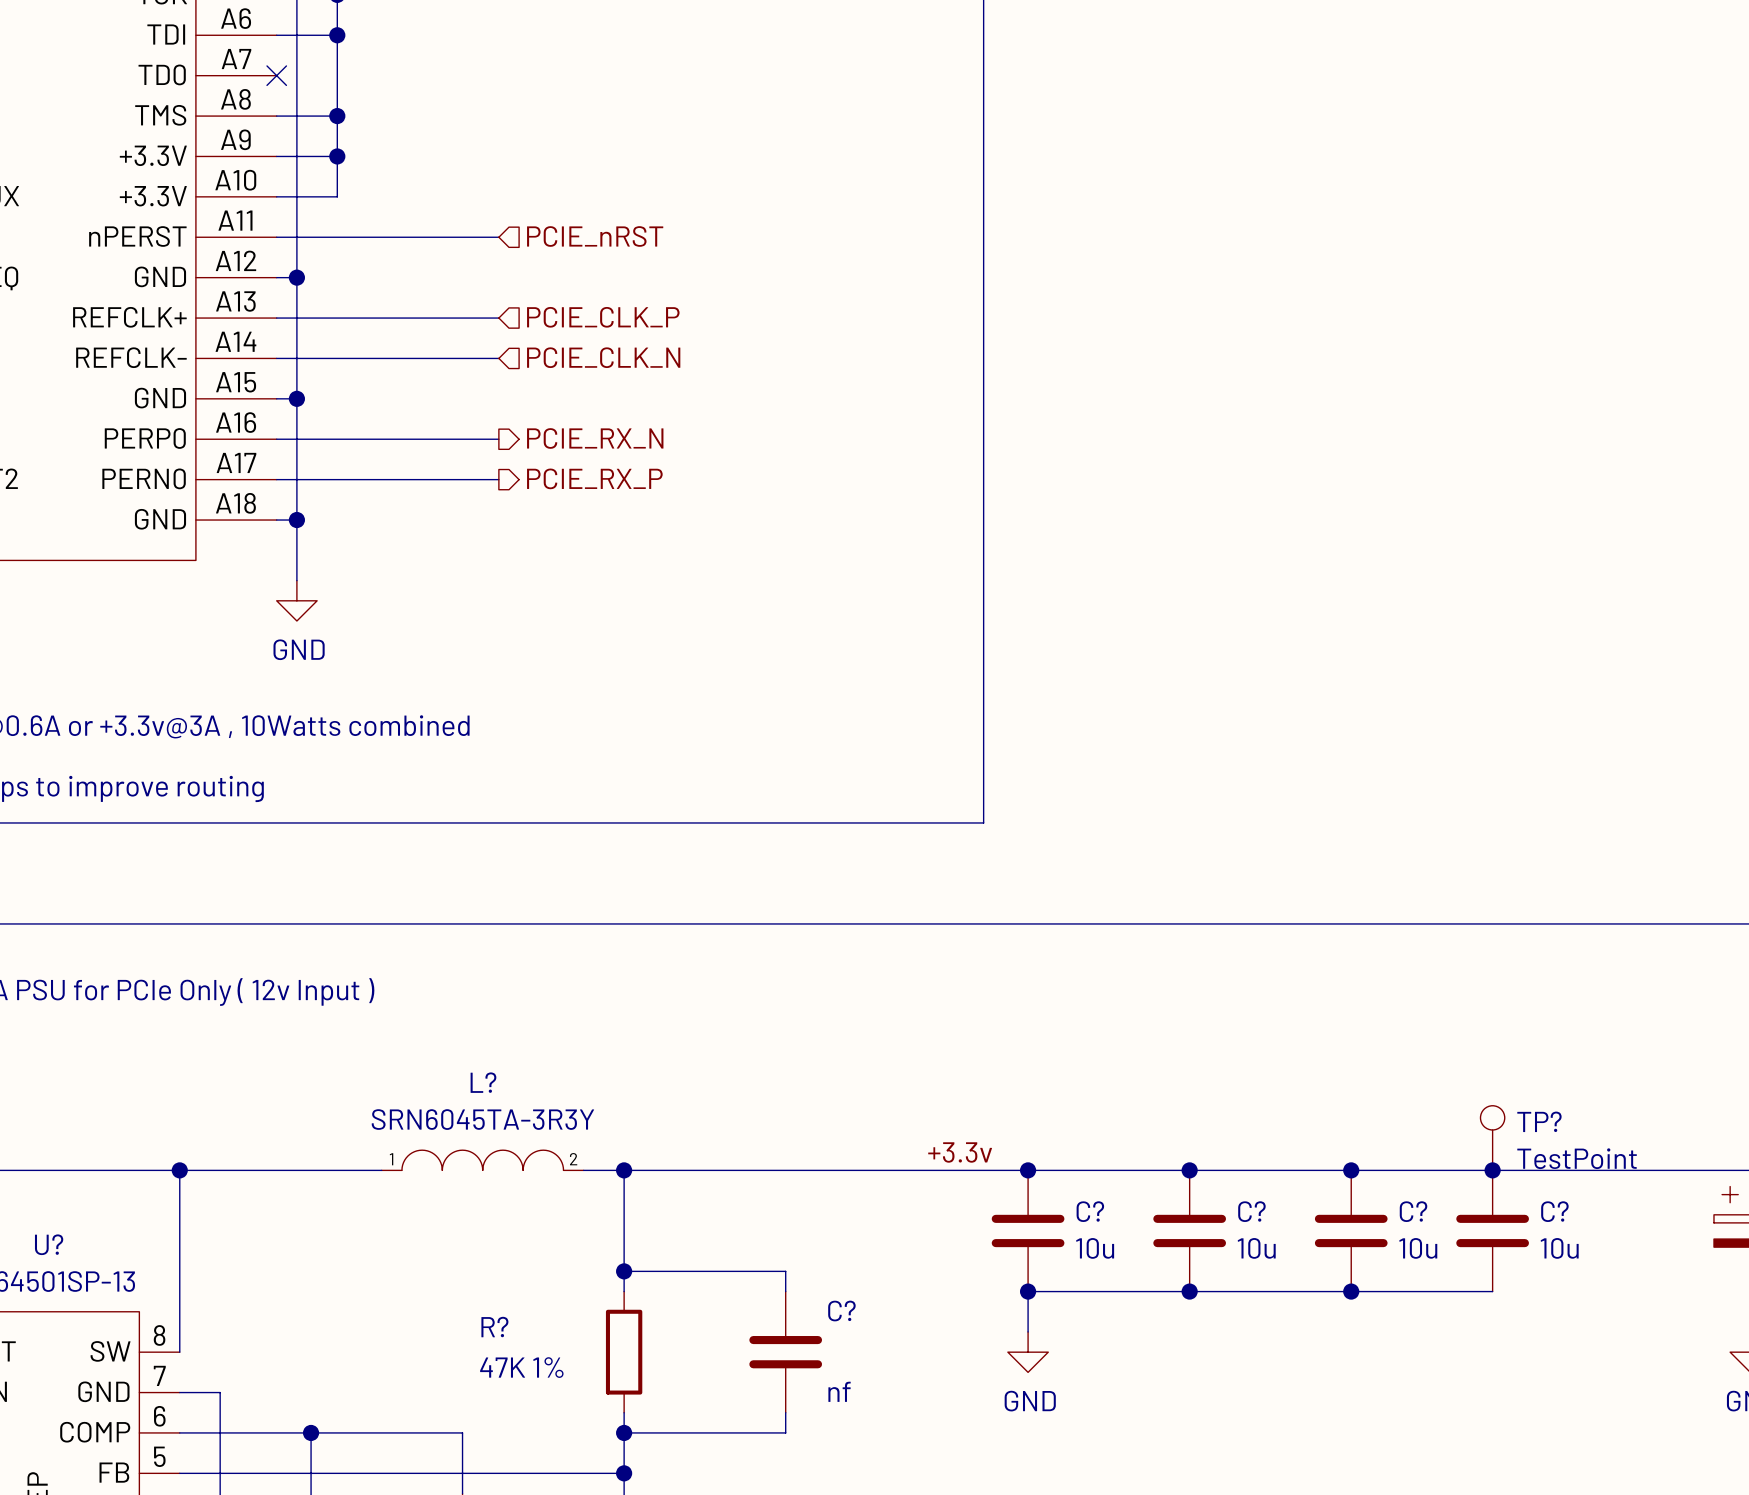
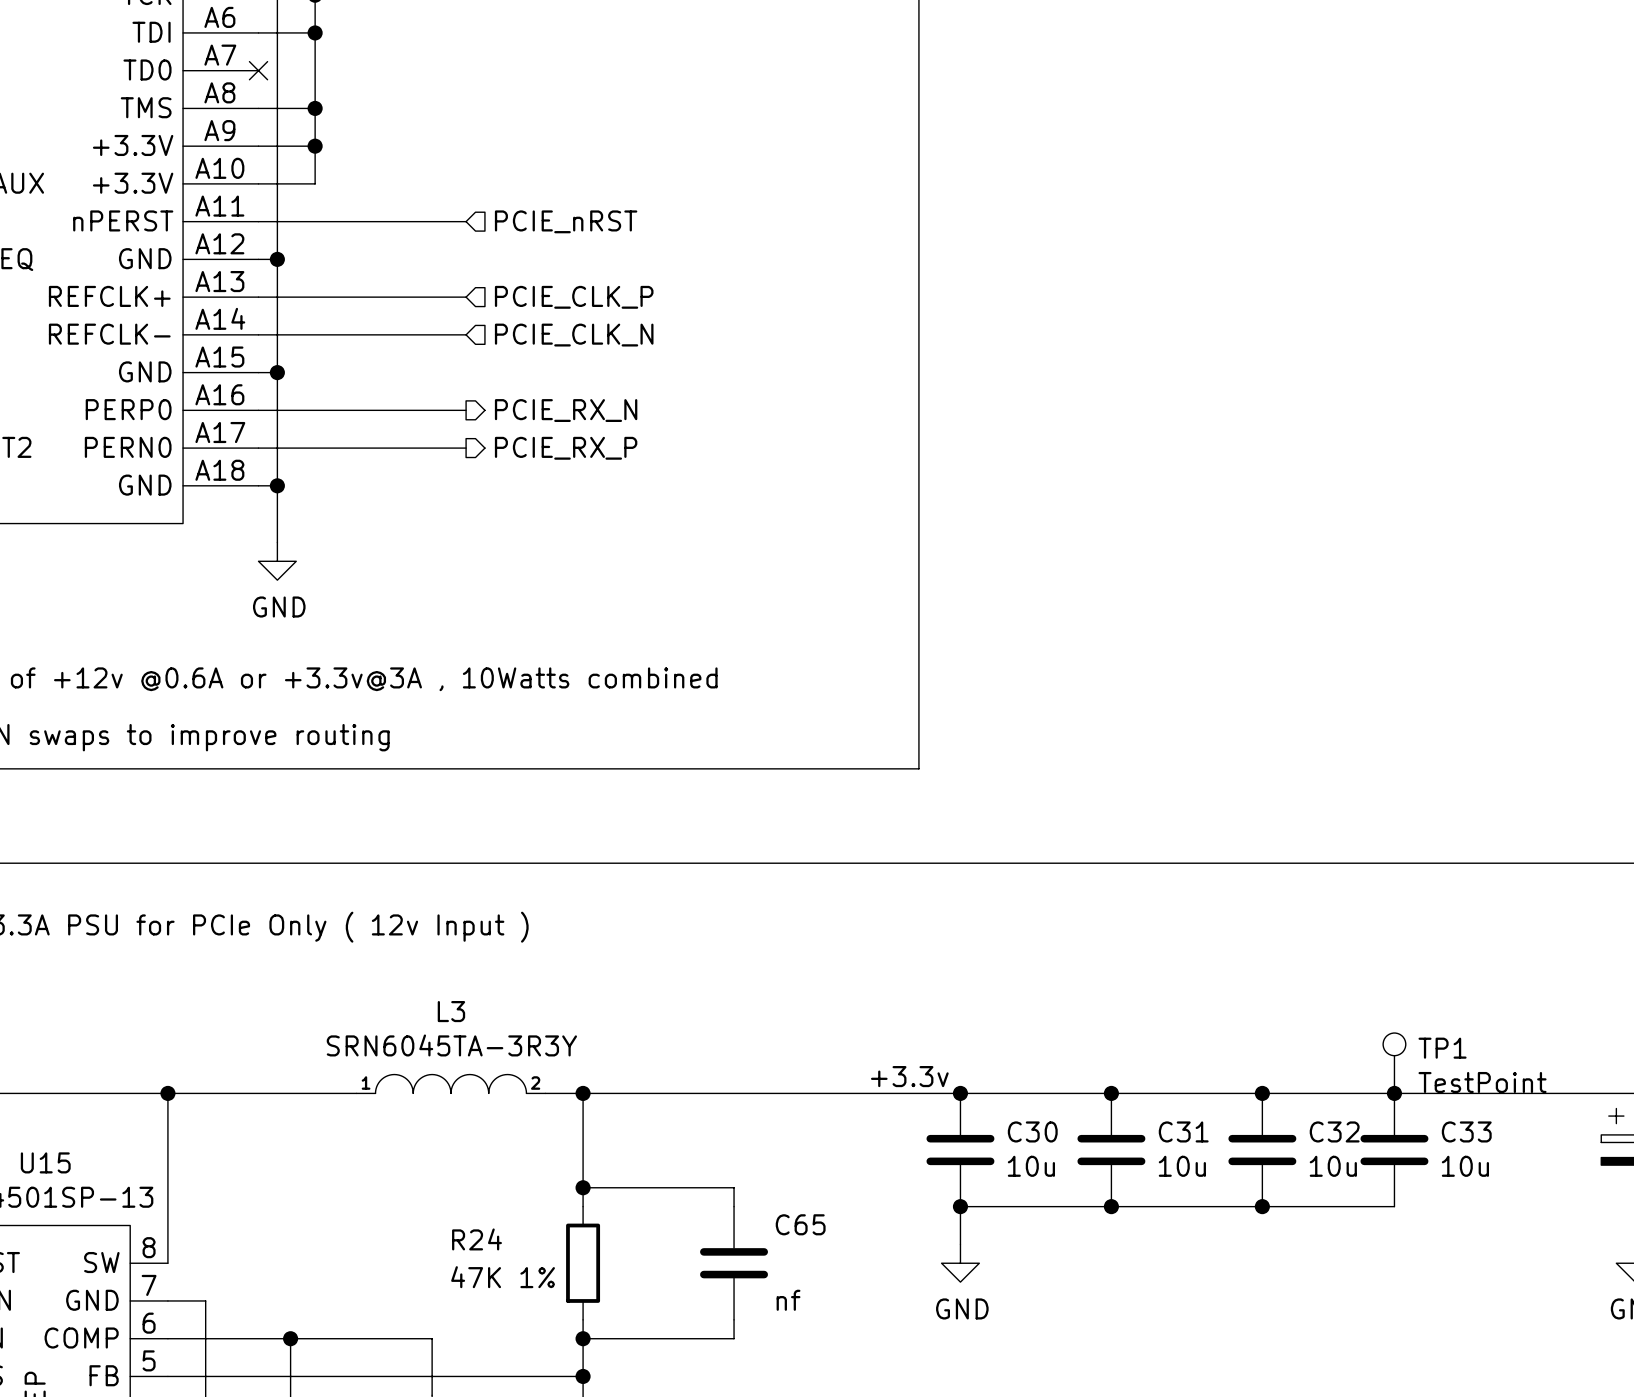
TP? name: TP? (1539, 1121) -> TP1 (1442, 1048)
L?: SRN6045TA-3R3Y (482, 1160) -> none
L3: none -> SRN6045TA-3R3Y (450, 1083)
C? name: C? (1090, 1211) -> C30 (1032, 1131)
C? name: C? (1251, 1211) -> C31 (1183, 1131)
C? name: C? (1413, 1211) -> C32 (1334, 1131)
C? name: C? (1554, 1211) -> C33 (1466, 1131)
U? name: U? (49, 1244) -> U15 (45, 1162)
C? name: C? (841, 1311) -> C65 (800, 1224)
R? name: R? (494, 1327) -> R24 (477, 1239)

